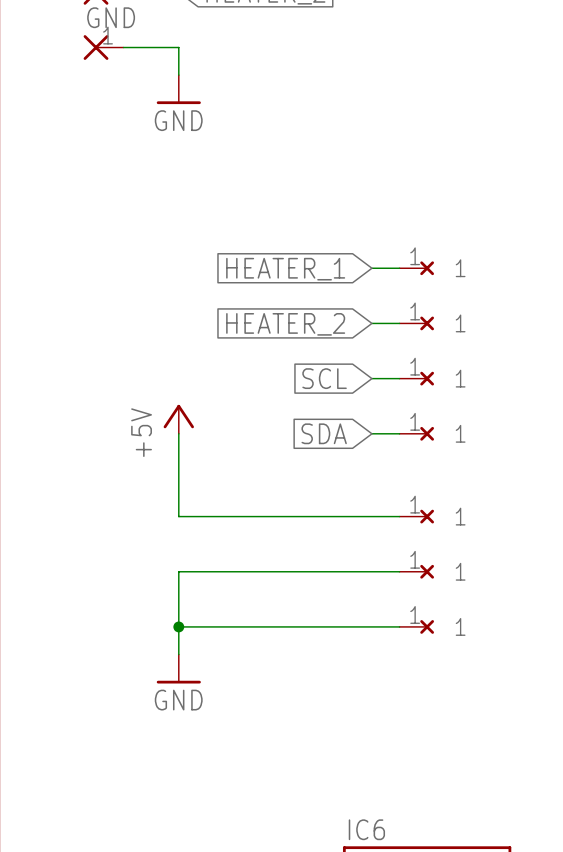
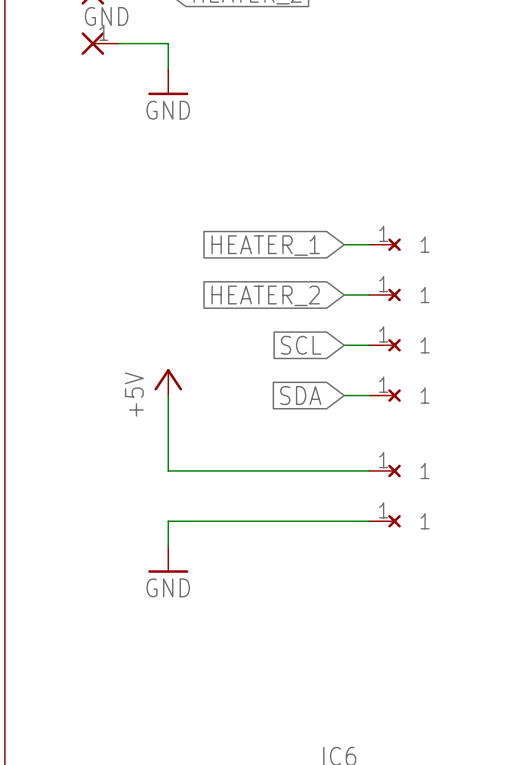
wire: (178, 626) (399, 626) -> none
junction: (178, 626) -> none
part: (416, 626) -> none
power symbol position: GND (178, 669) -> GND (168, 559)

